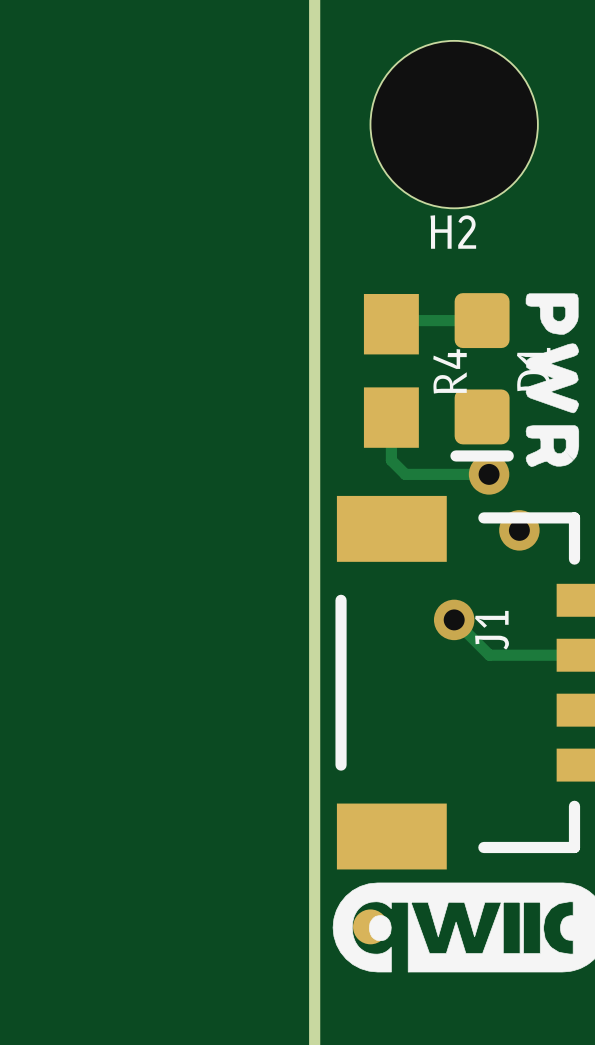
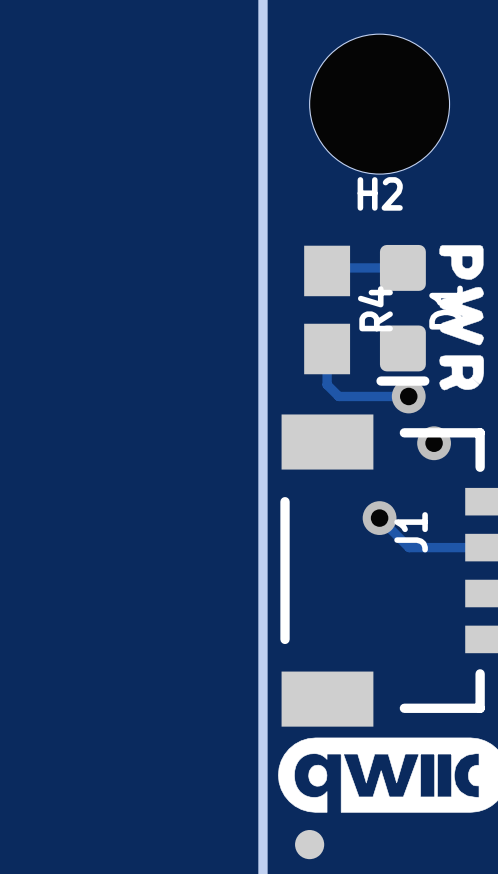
part position: (370, 926) -> (309, 844)

